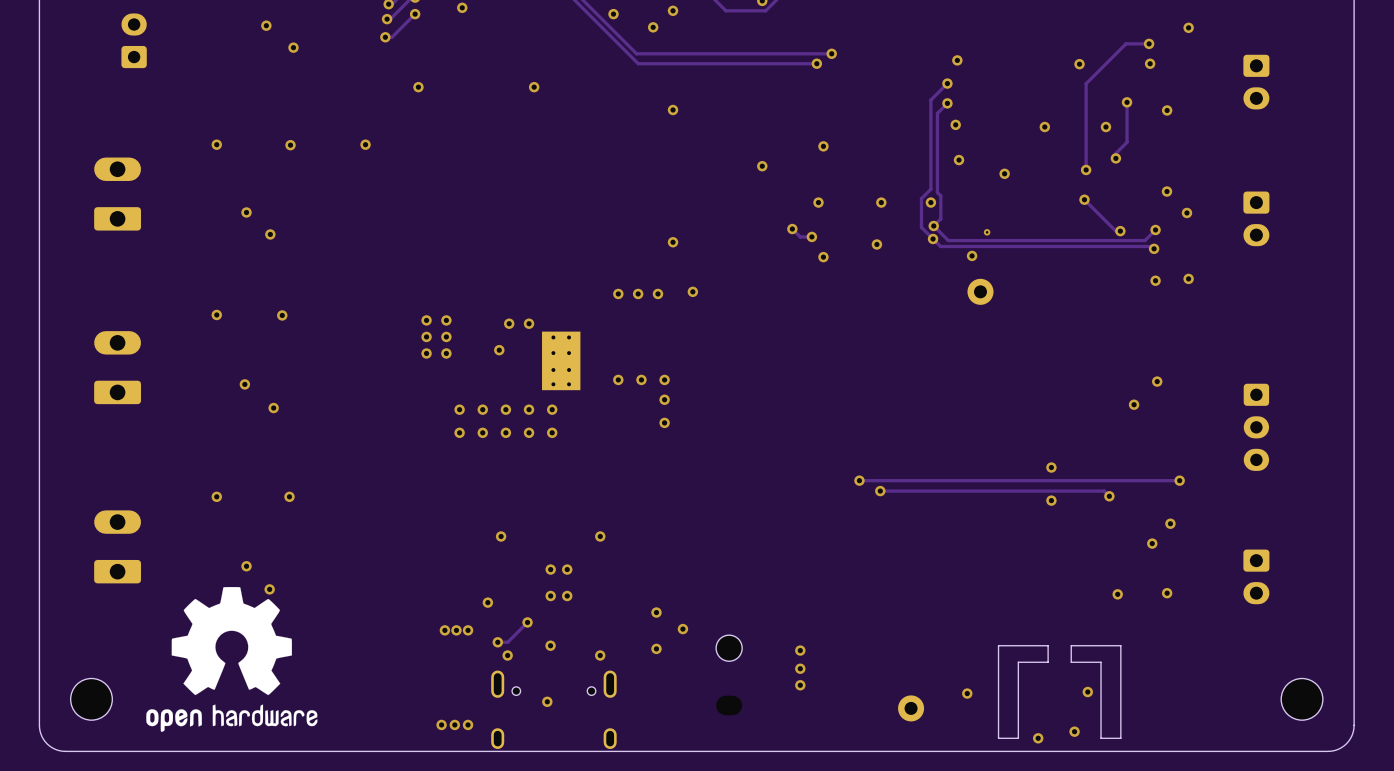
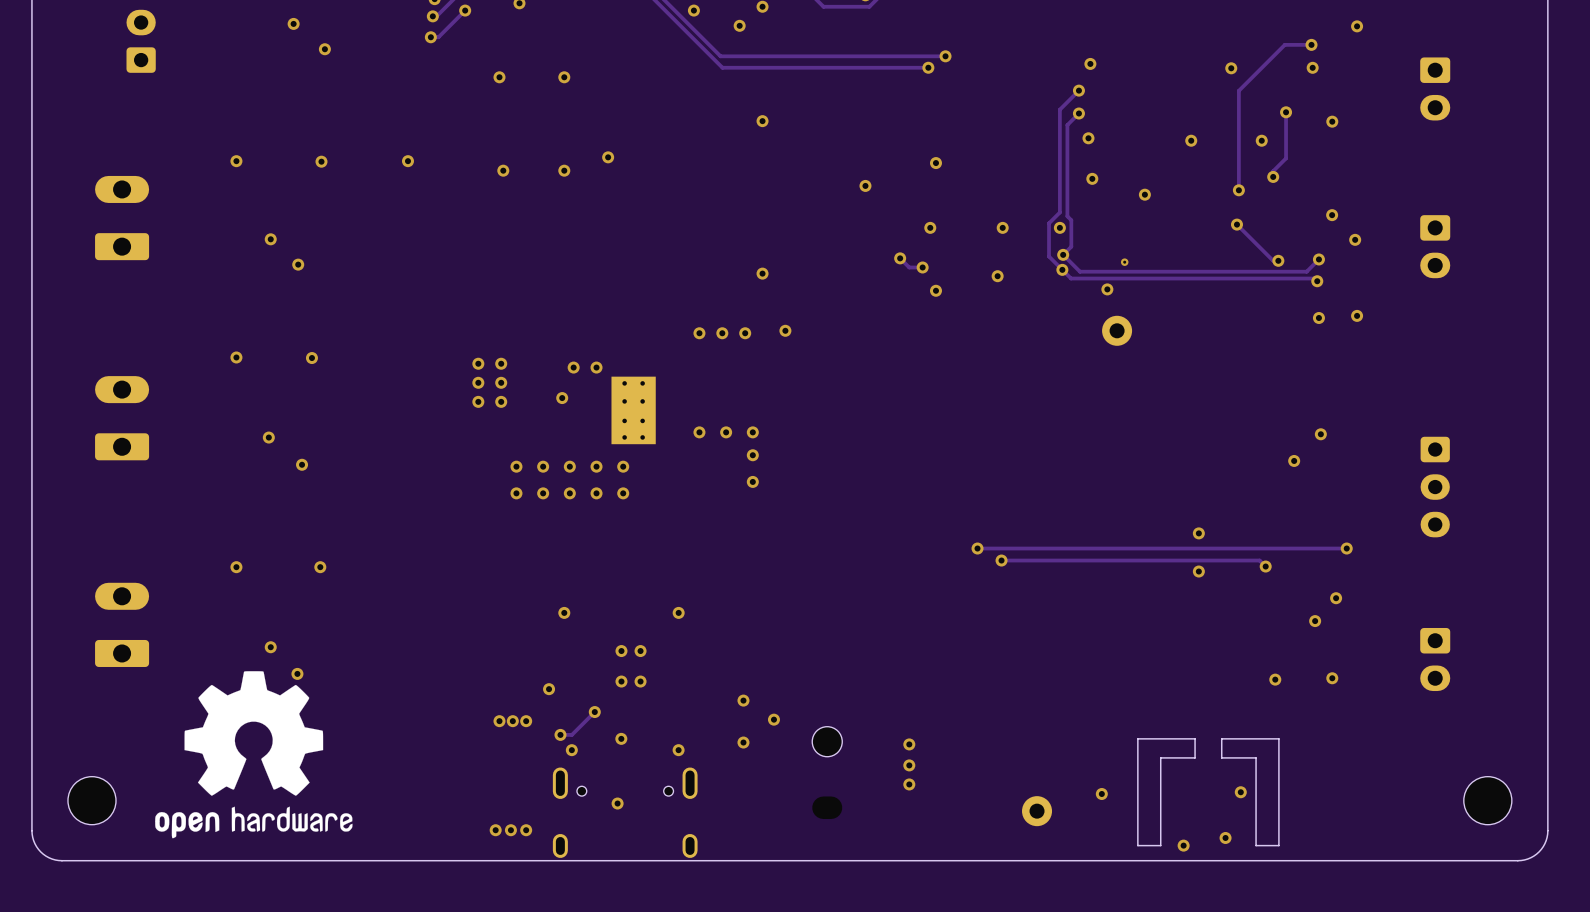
via: none -> (564, 77)
via position: (418, 87) -> (499, 77)
via: (534, 87) -> none
via: none -> (608, 157)
via: none -> (503, 170)
via: none -> (564, 170)

